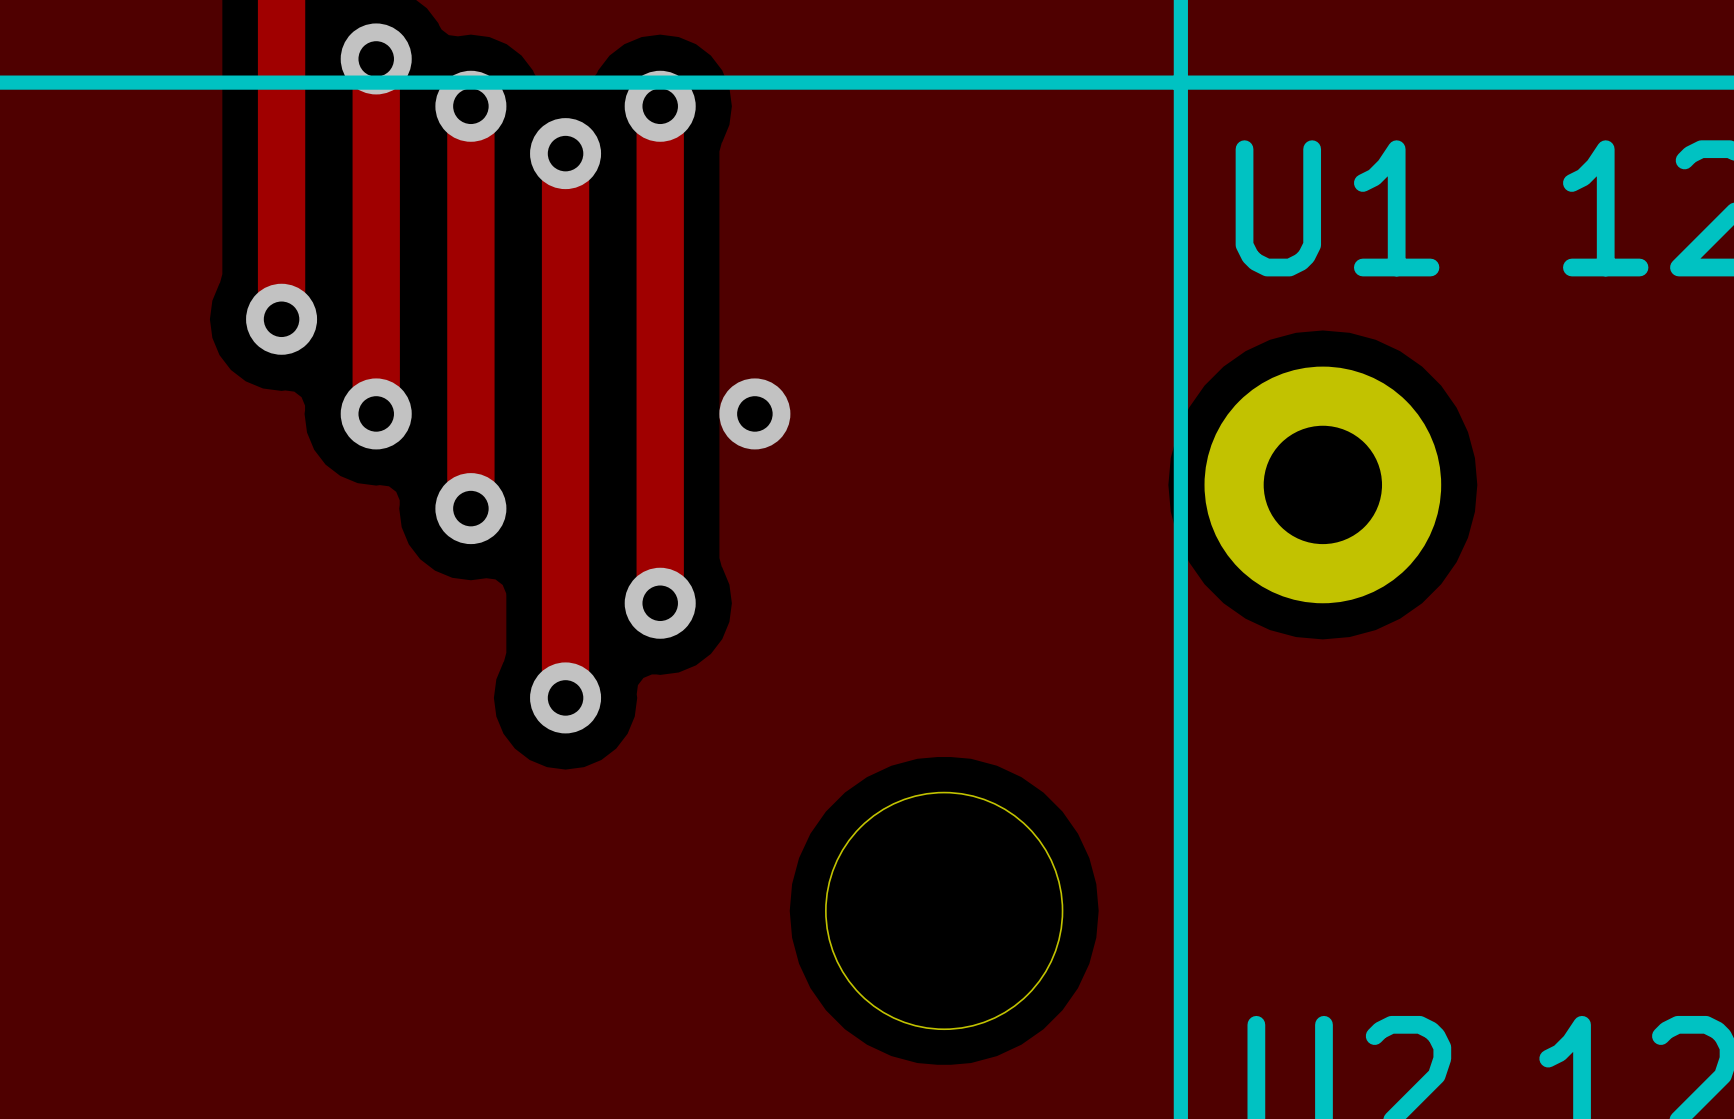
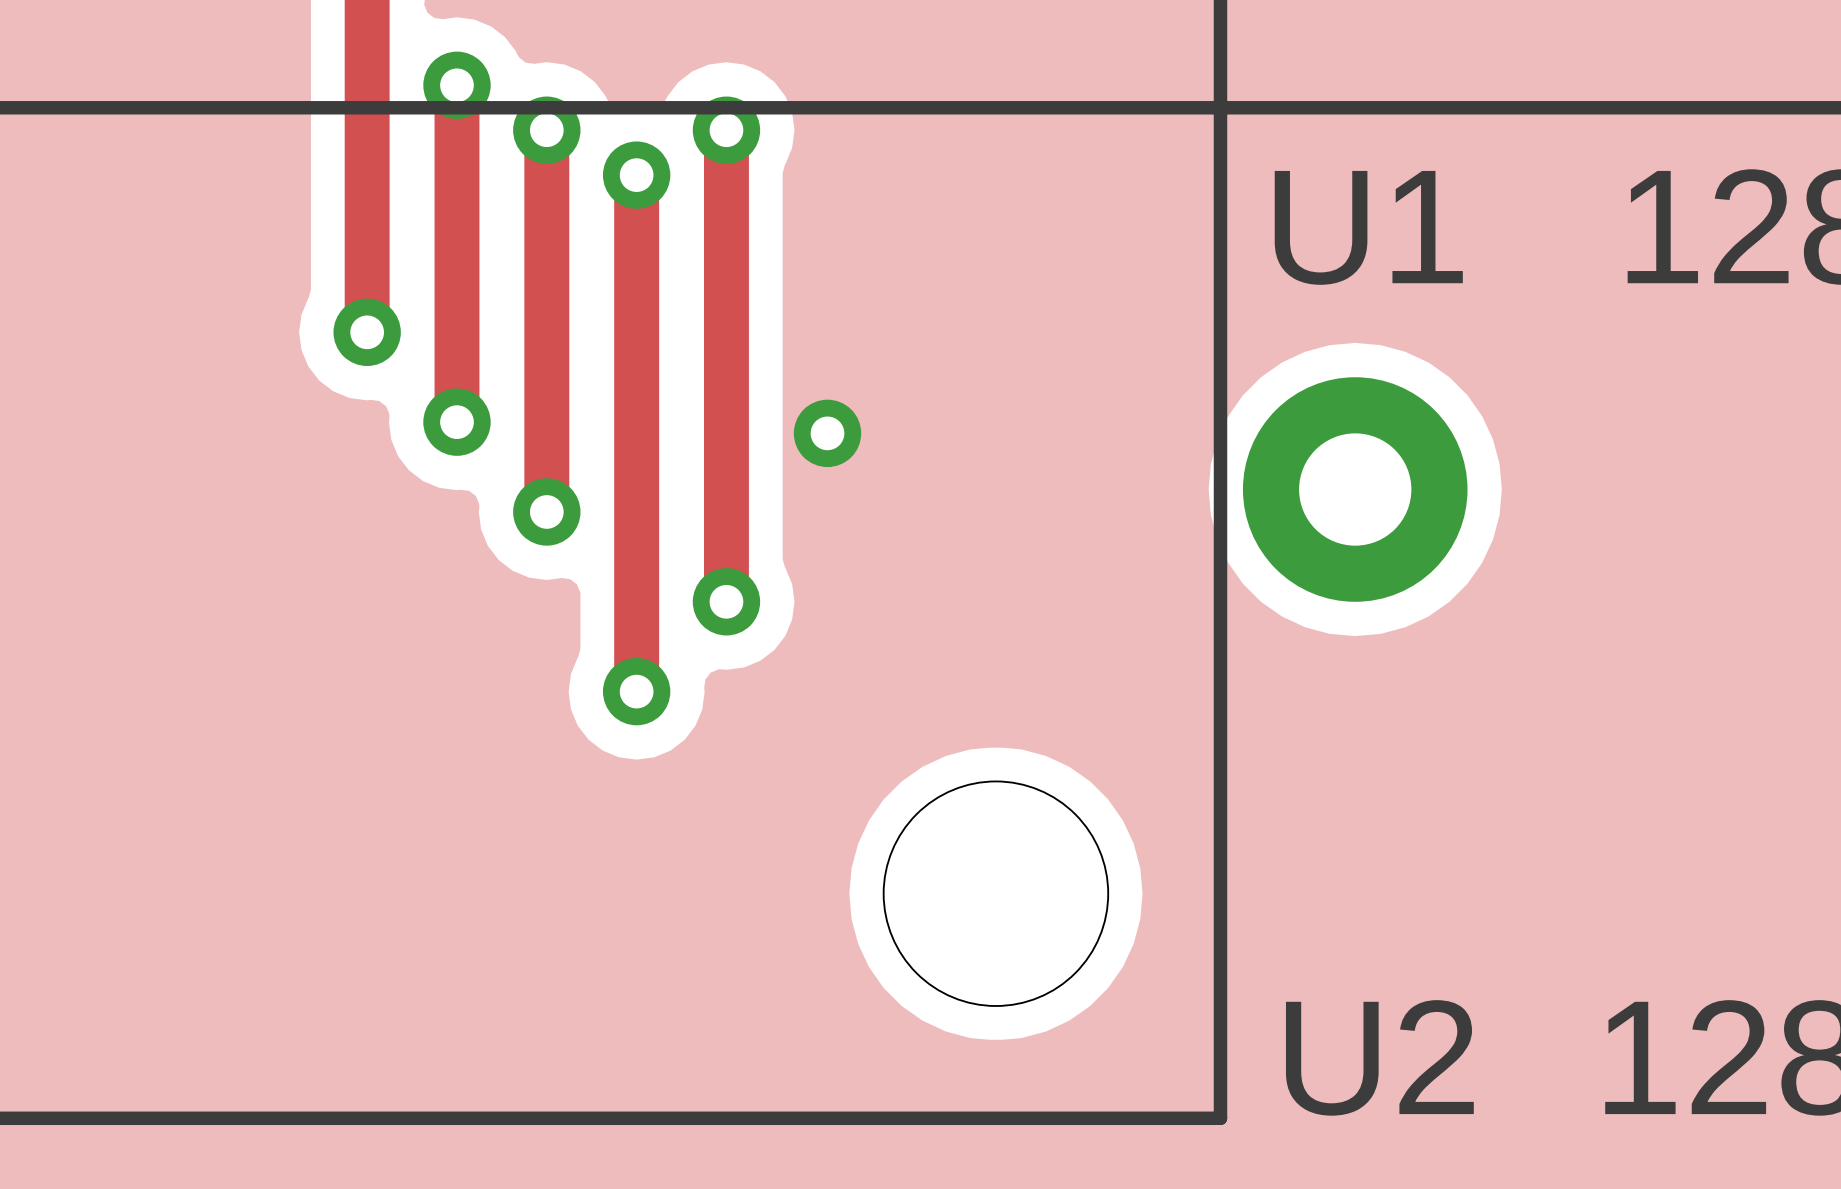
via position: (754, 413) -> (827, 433)

